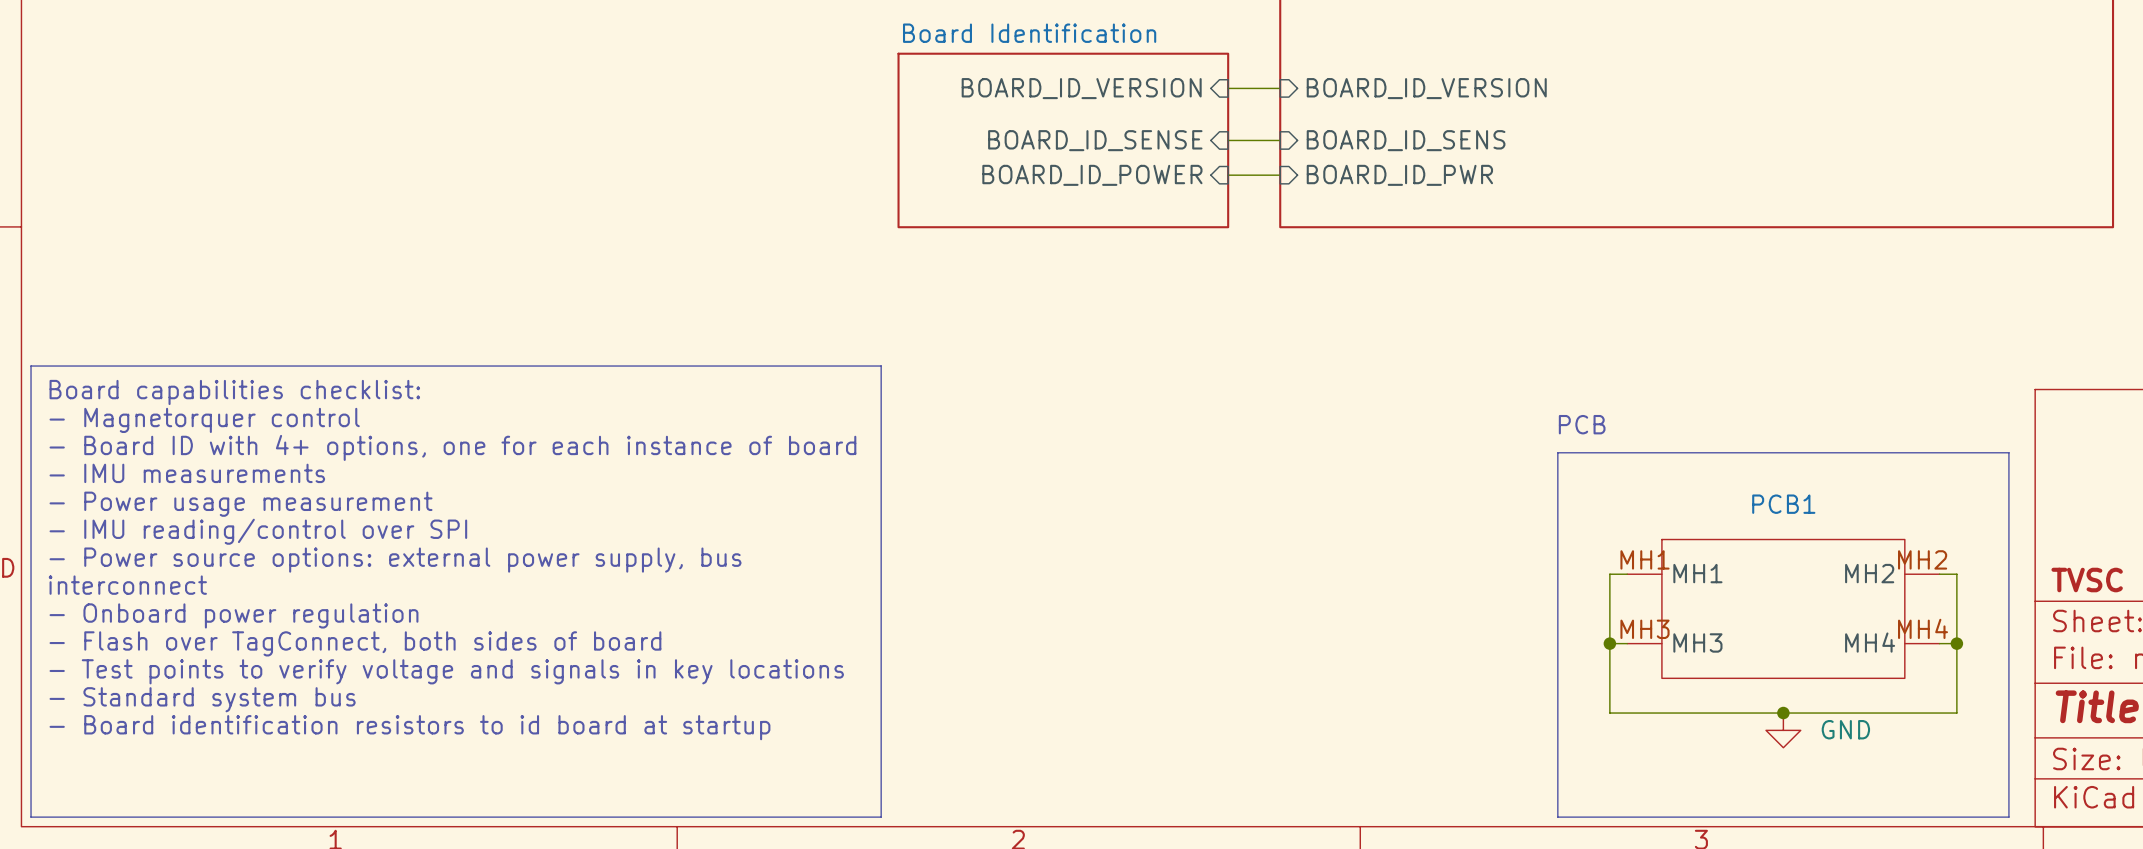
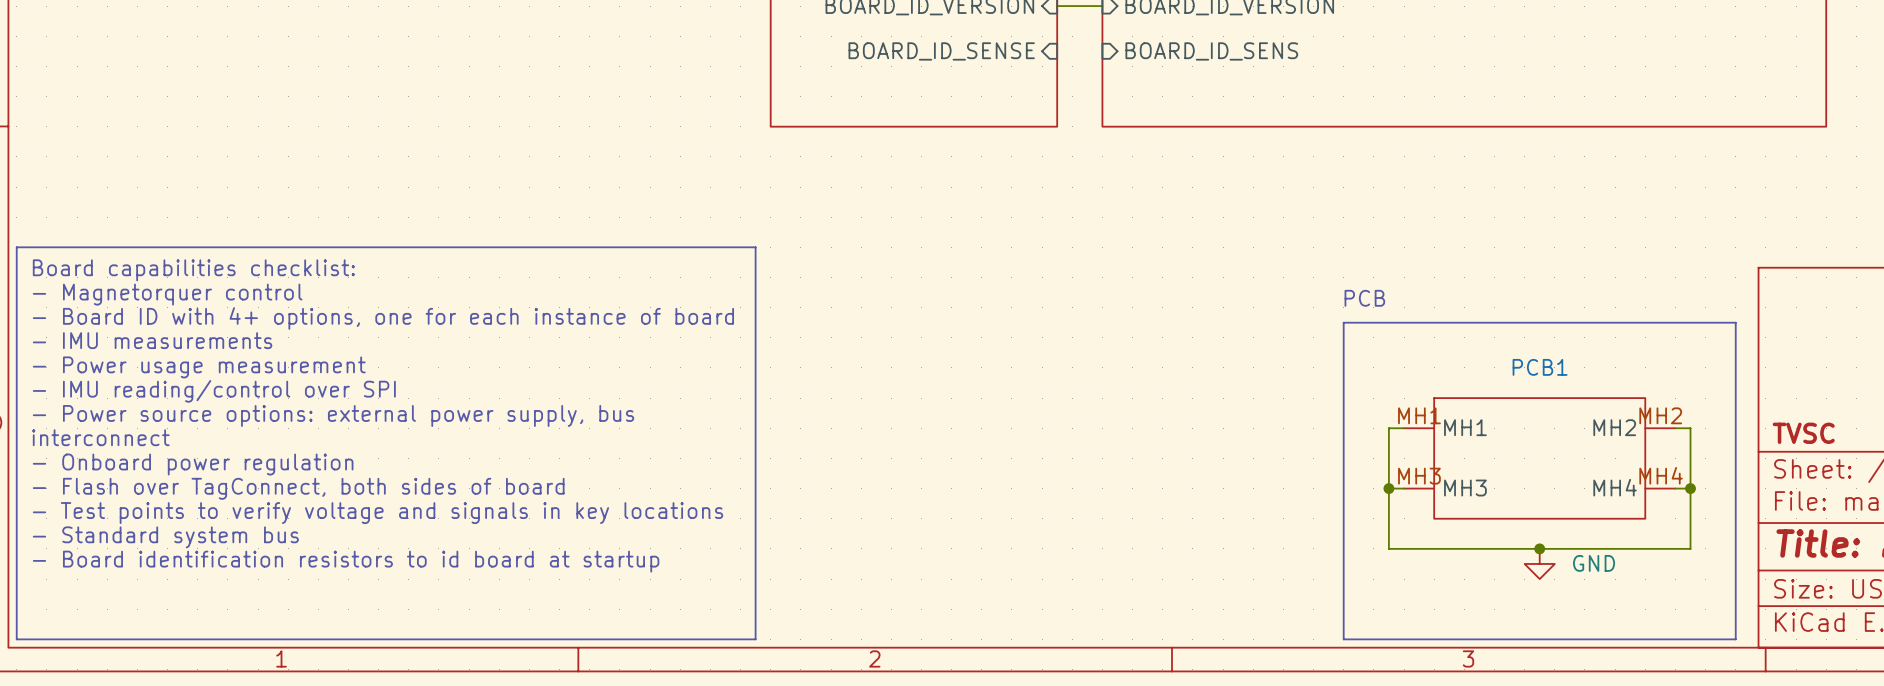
wire: (1228, 140) (1280, 140) -> none
sheet pin: BOARD_ID_POWER (1092, 175) -> none
wire: (1228, 175) (1280, 175) -> none
sheet pin: BOARD_ID_PWR (1399, 175) -> none

